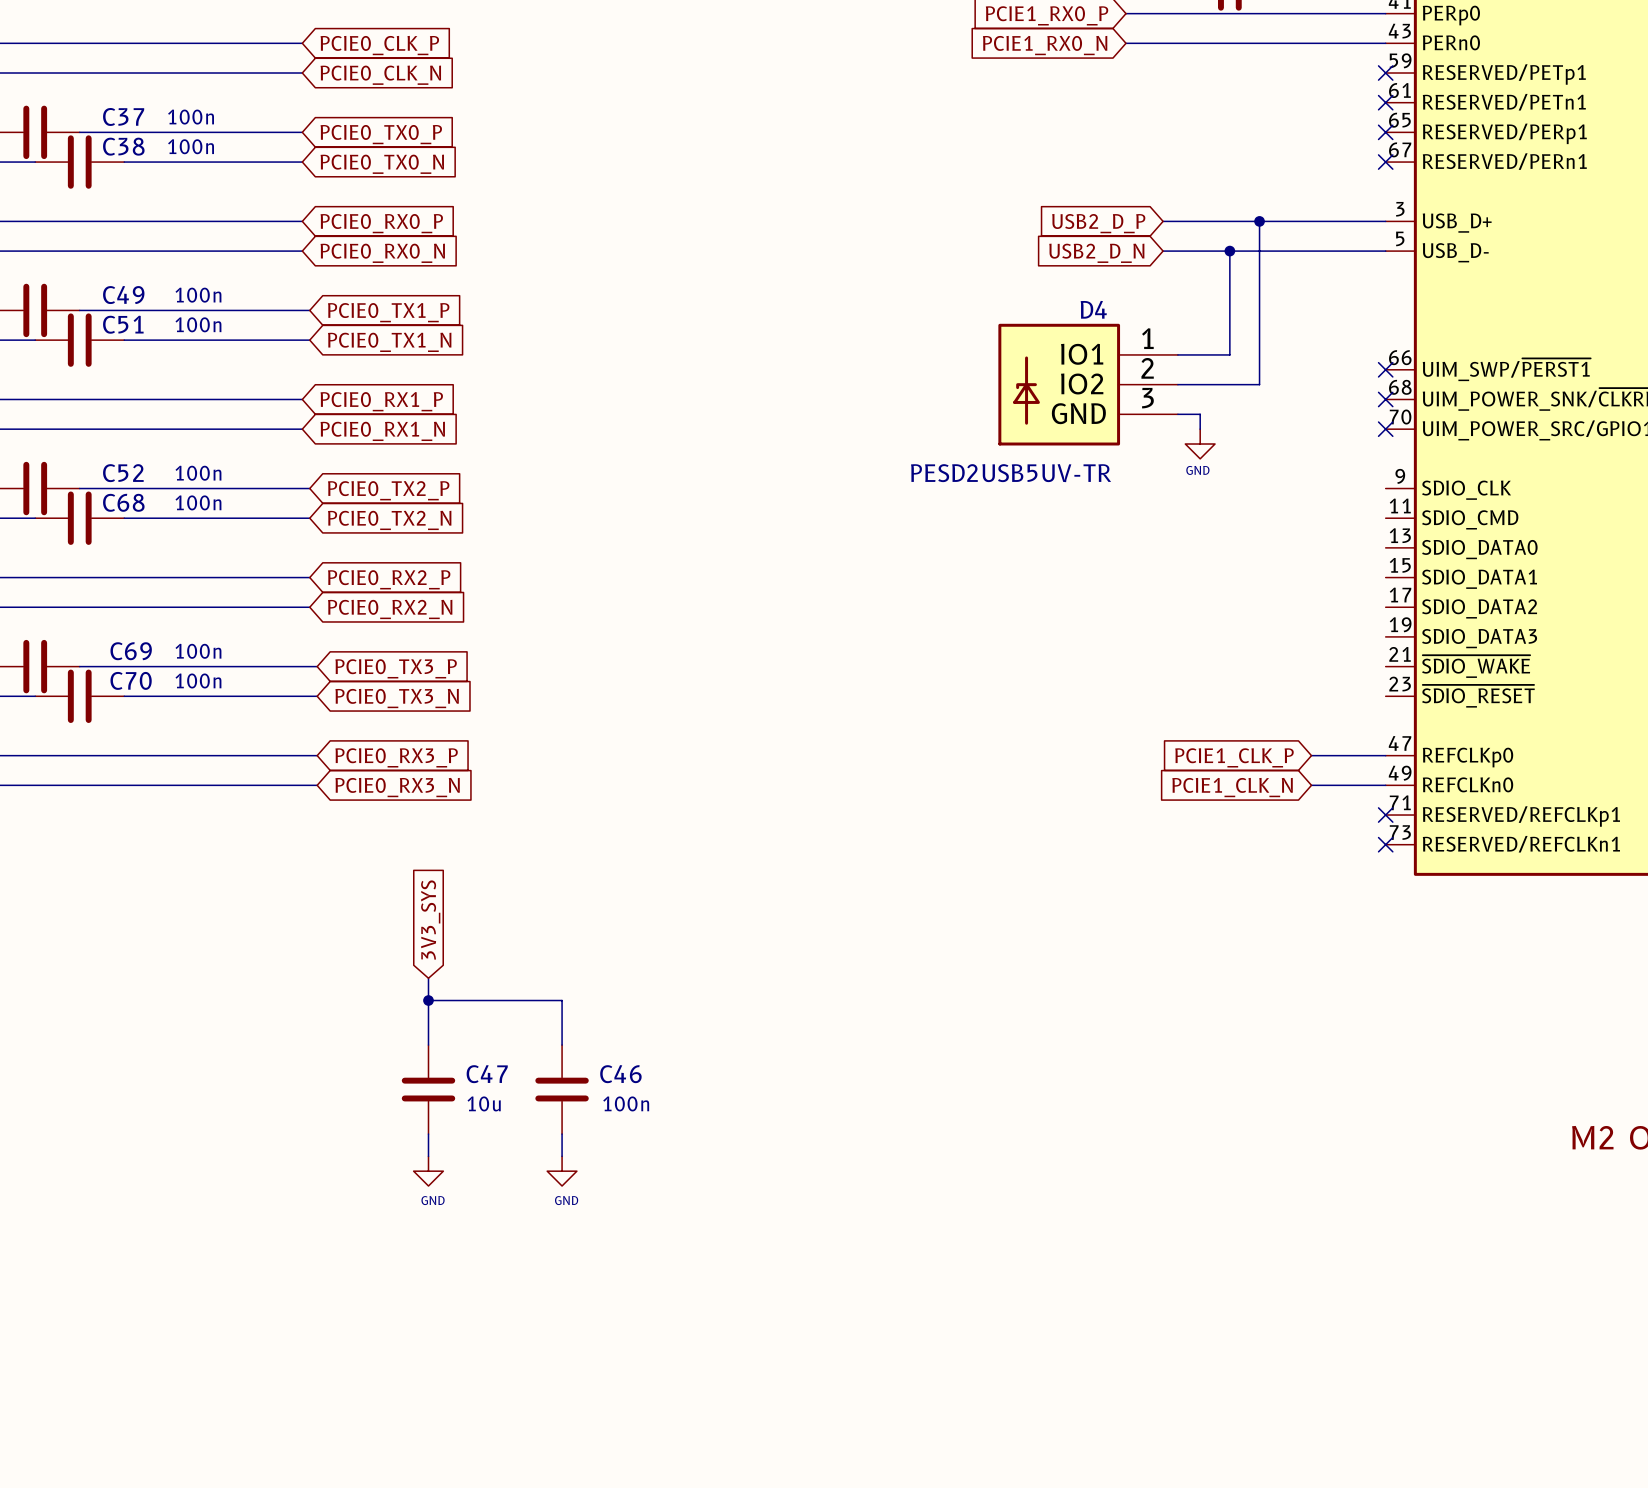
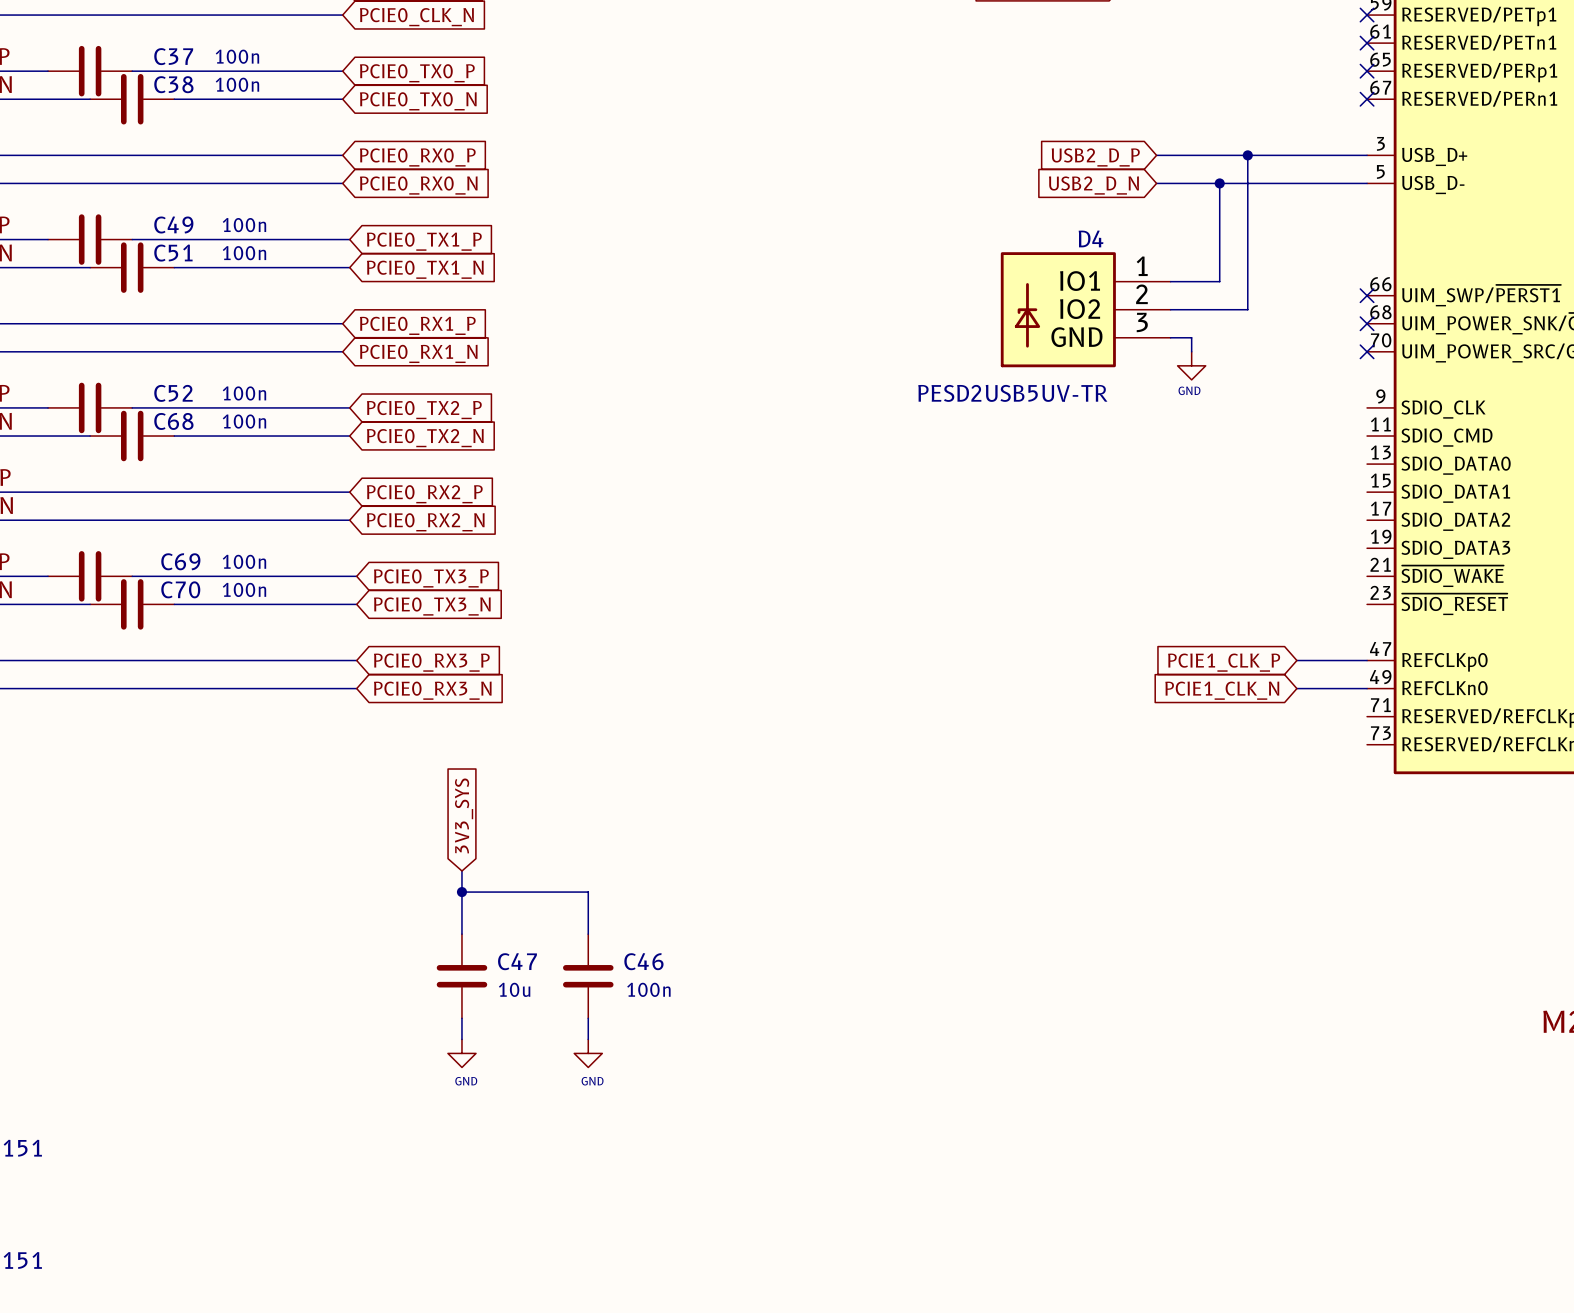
no-connect mark: (1385, 815) -> none
no-connect mark: (1385, 844) -> none

